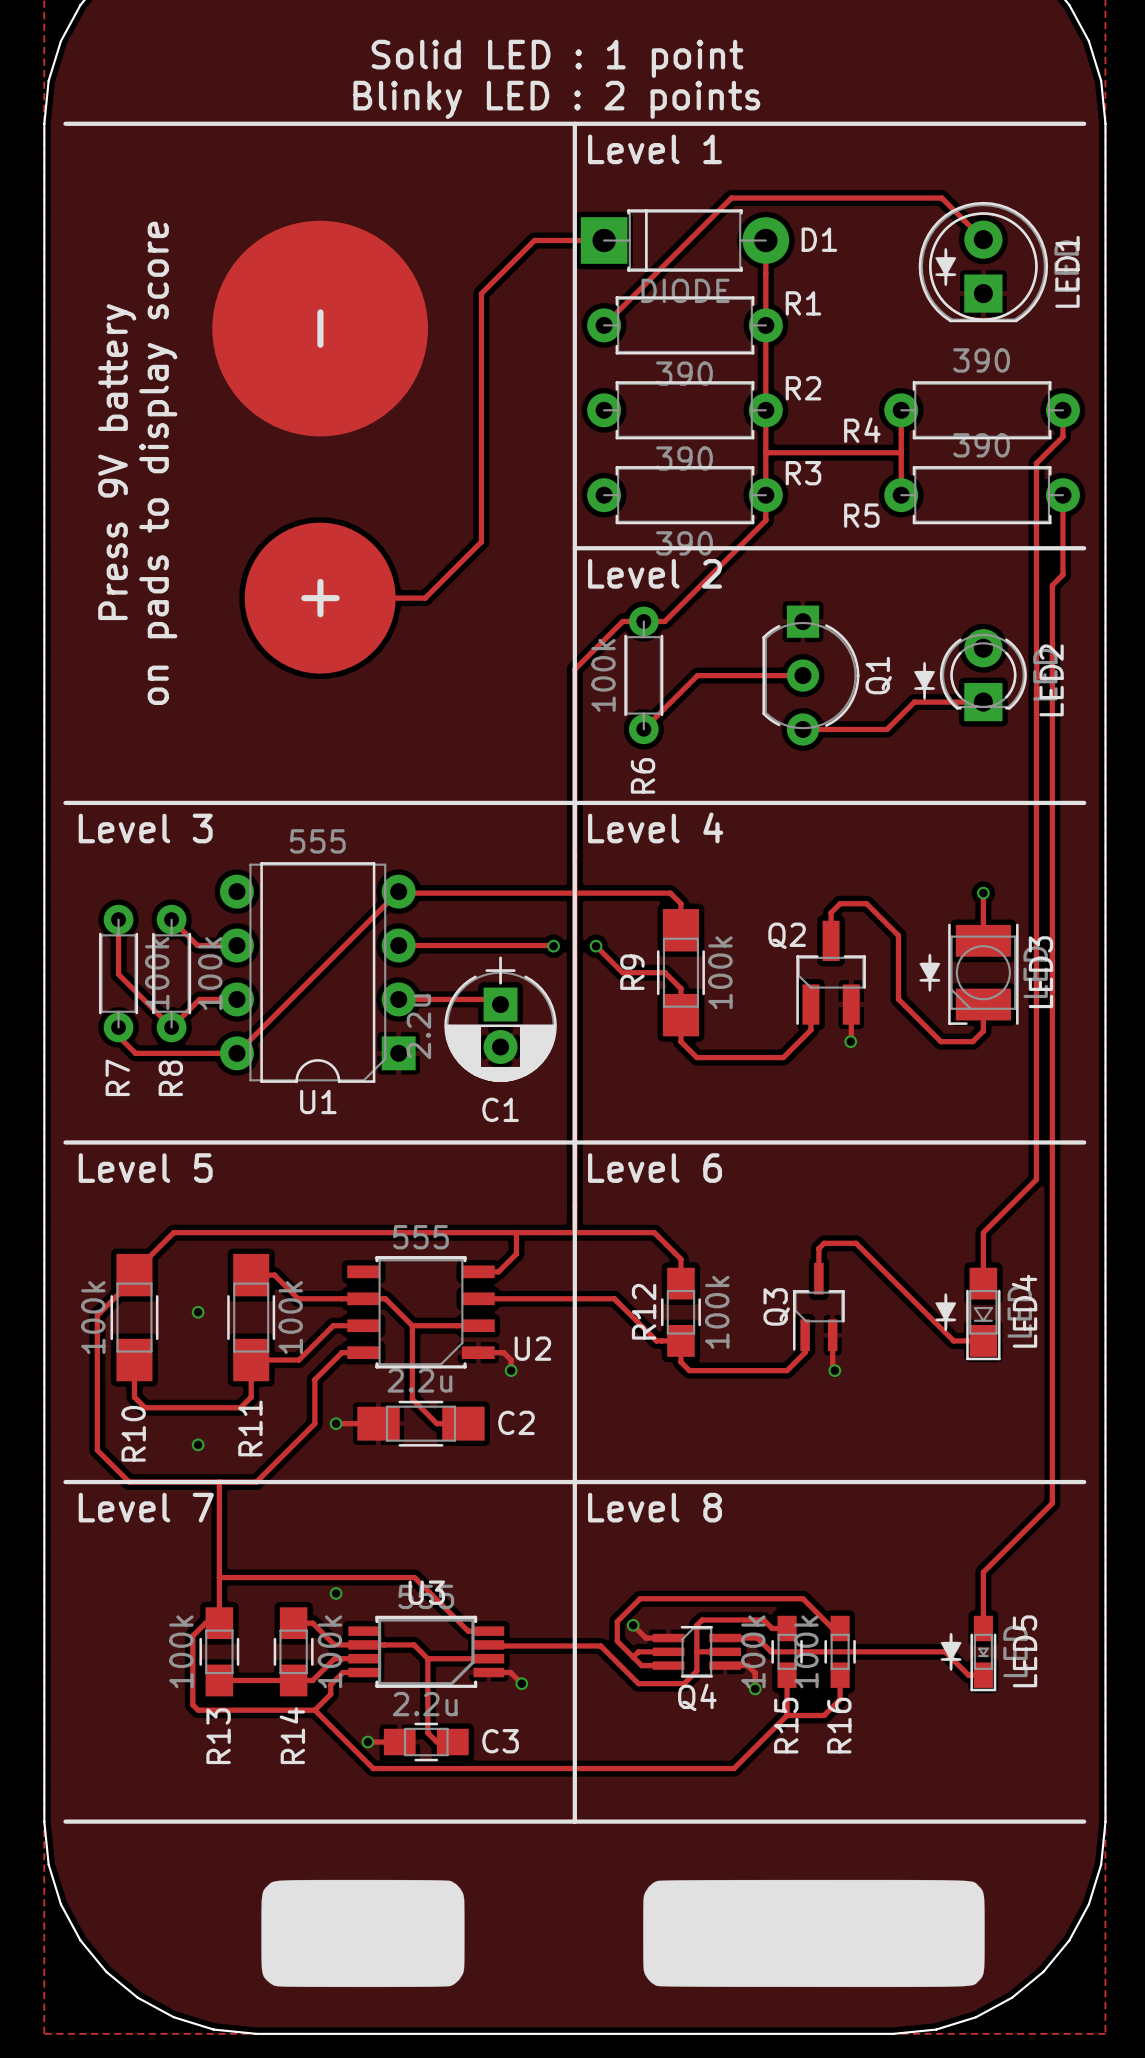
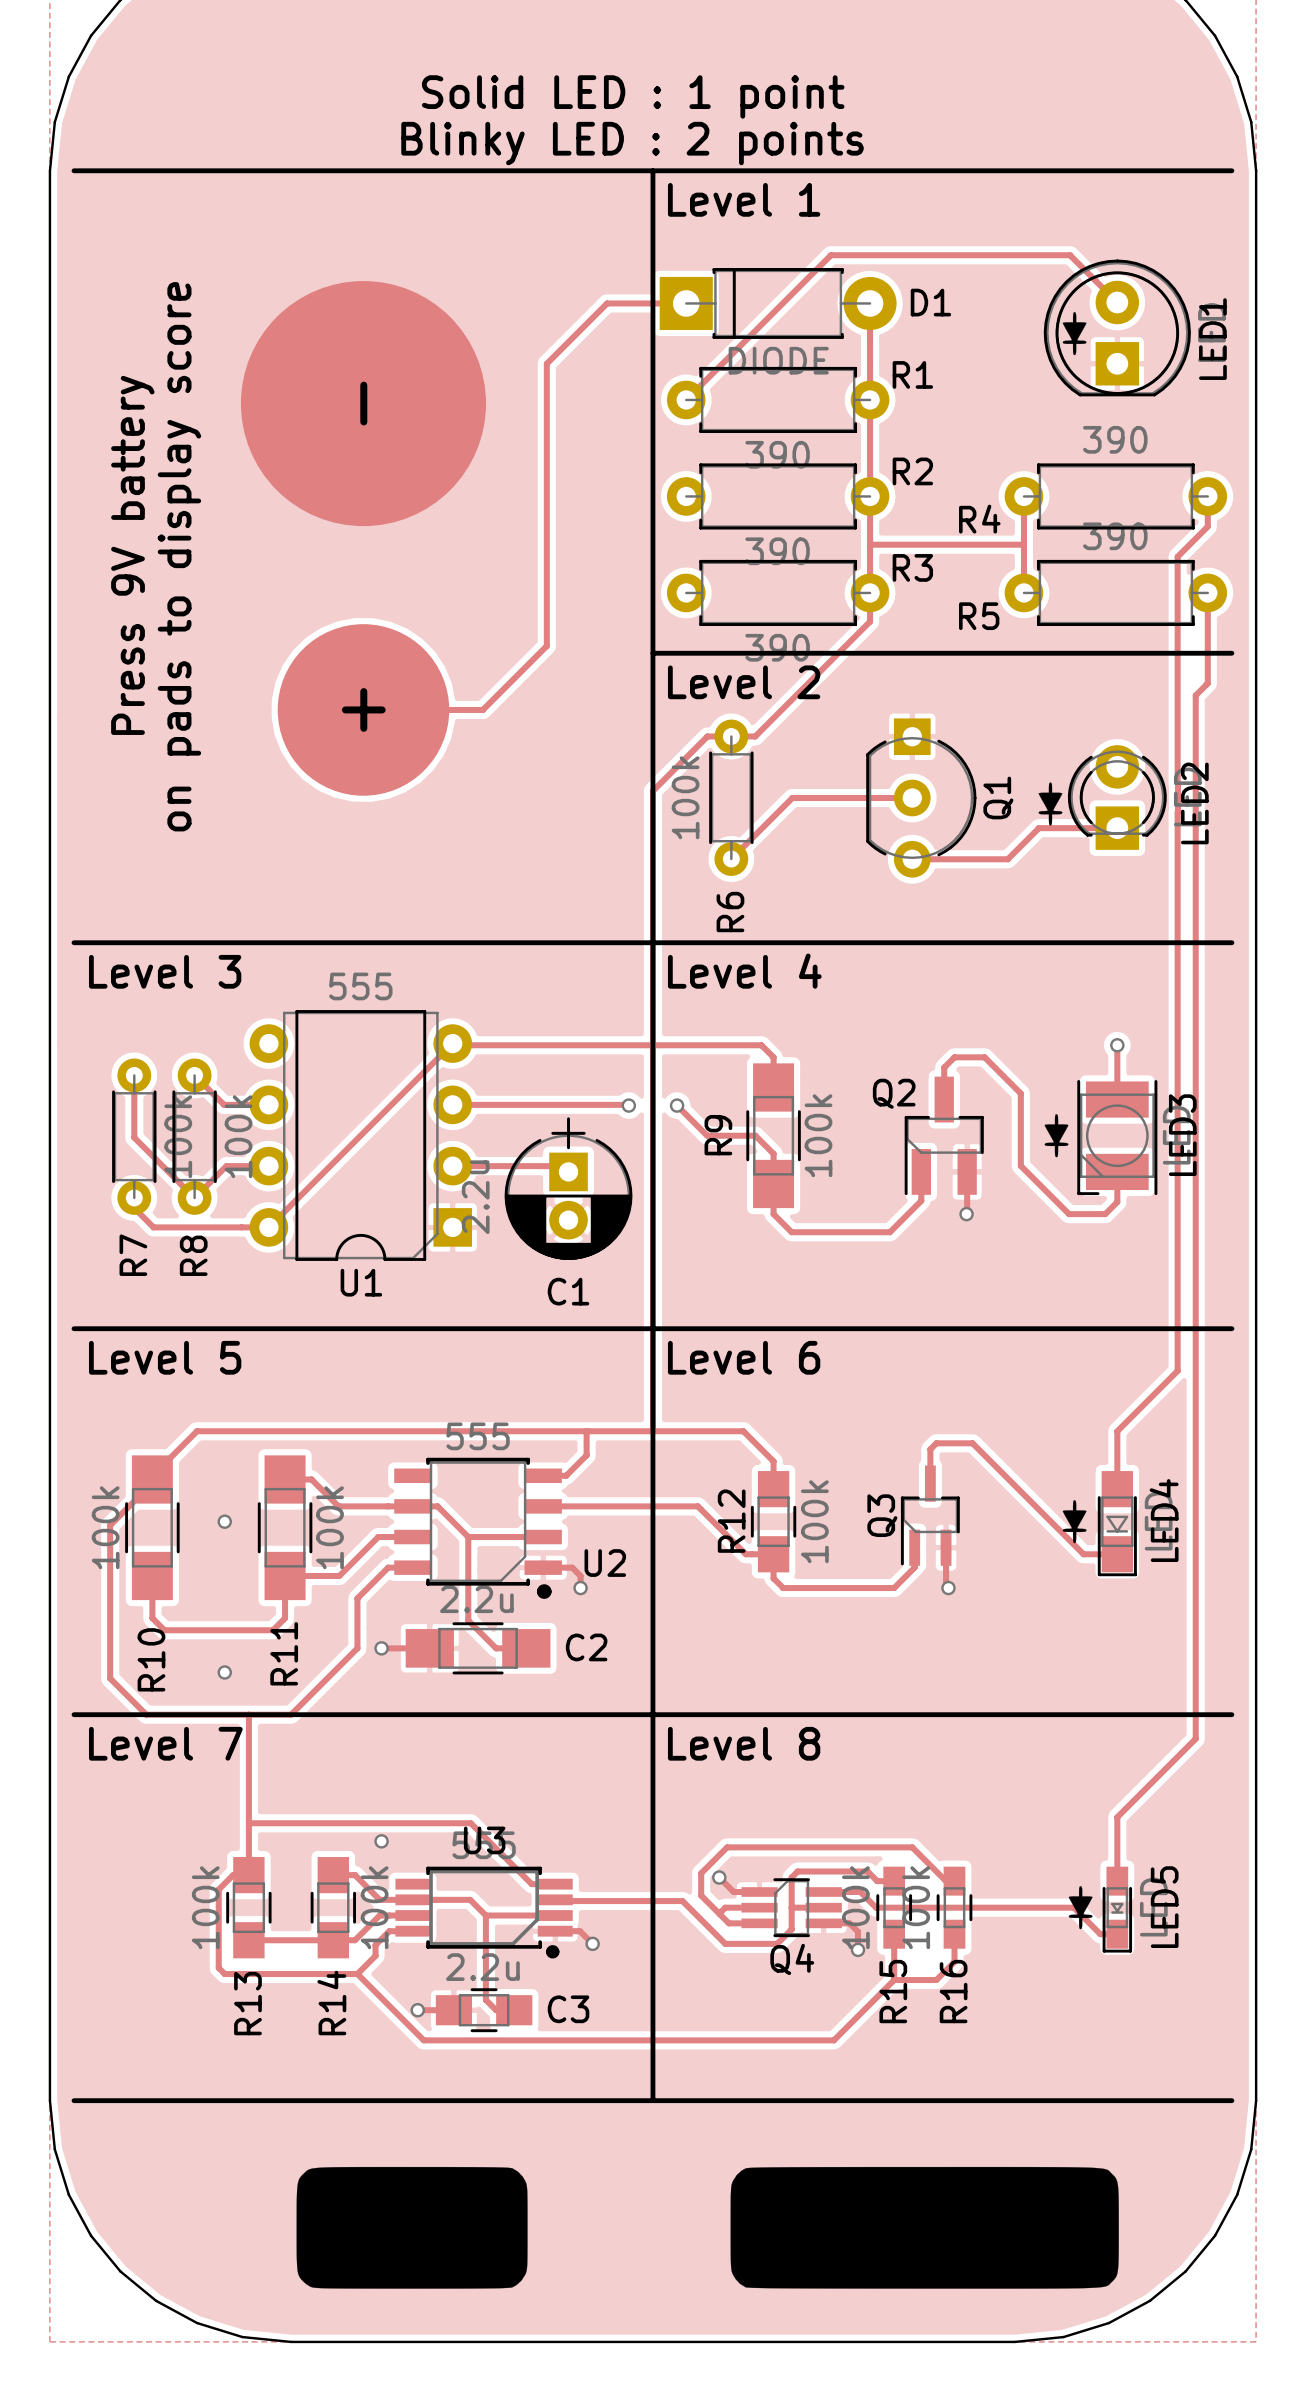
U2 footprint: [347, 1256, 495, 1369] -> [394, 1457, 562, 1599]
U3 footprint: [348, 1615, 505, 1688] -> [395, 1866, 573, 1959]

